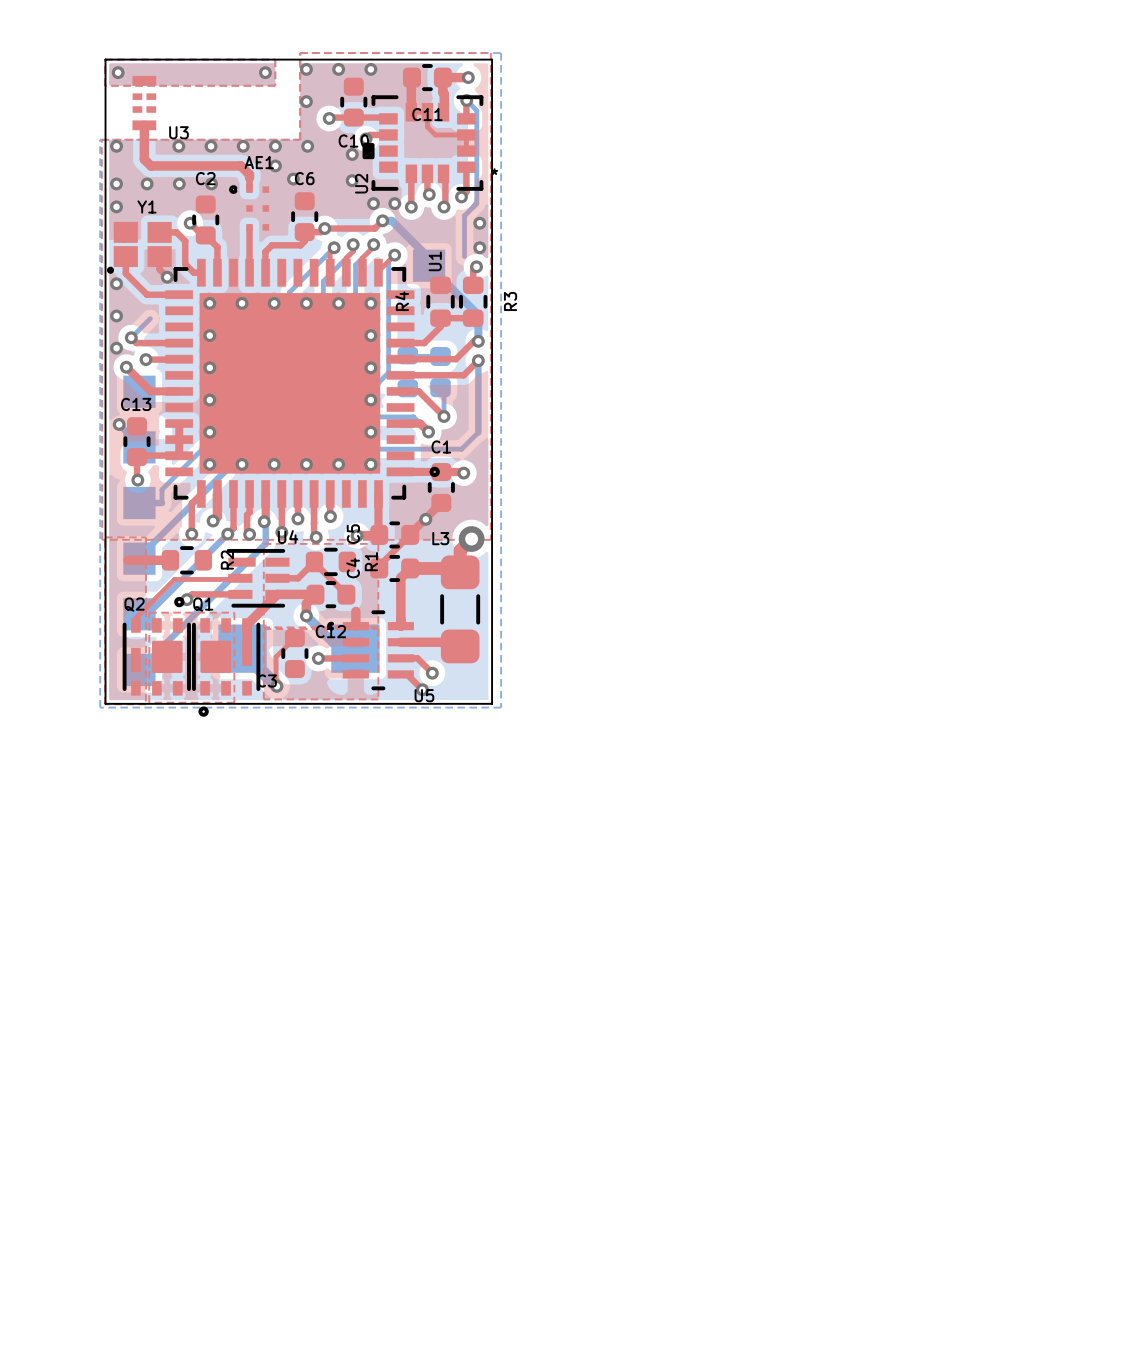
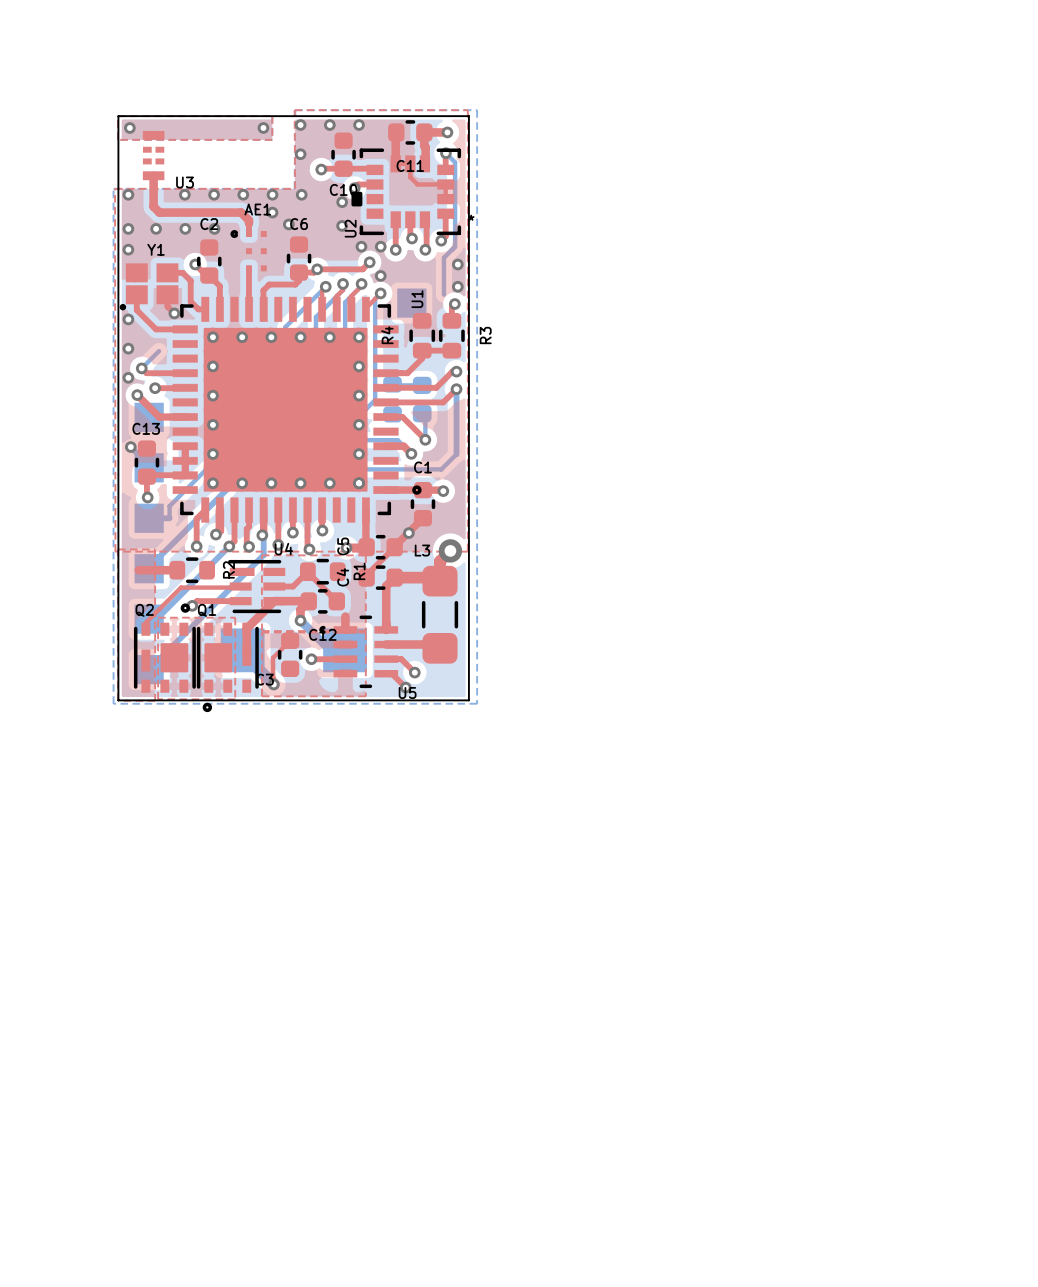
bottom track: (382, 220) (391, 220) (429, 258) (429, 265) (478, 315) (478, 341) -> none
via: none -> (380, 275)

